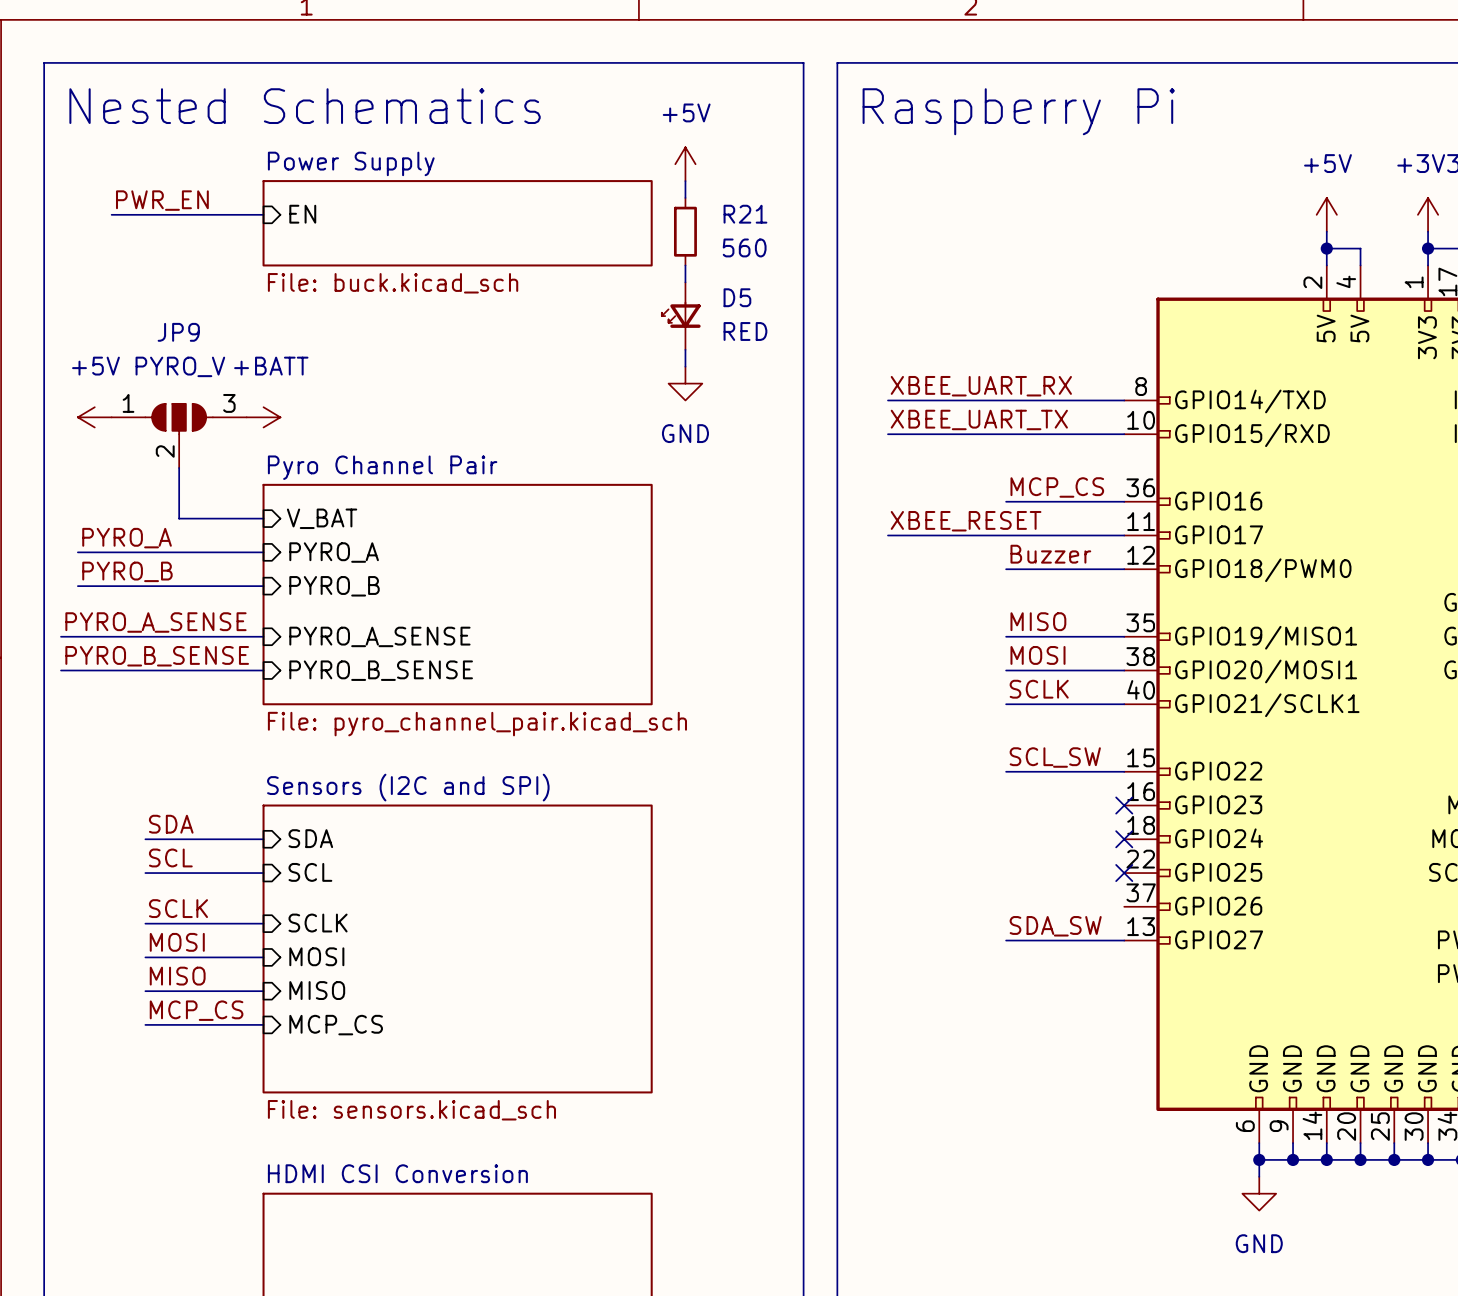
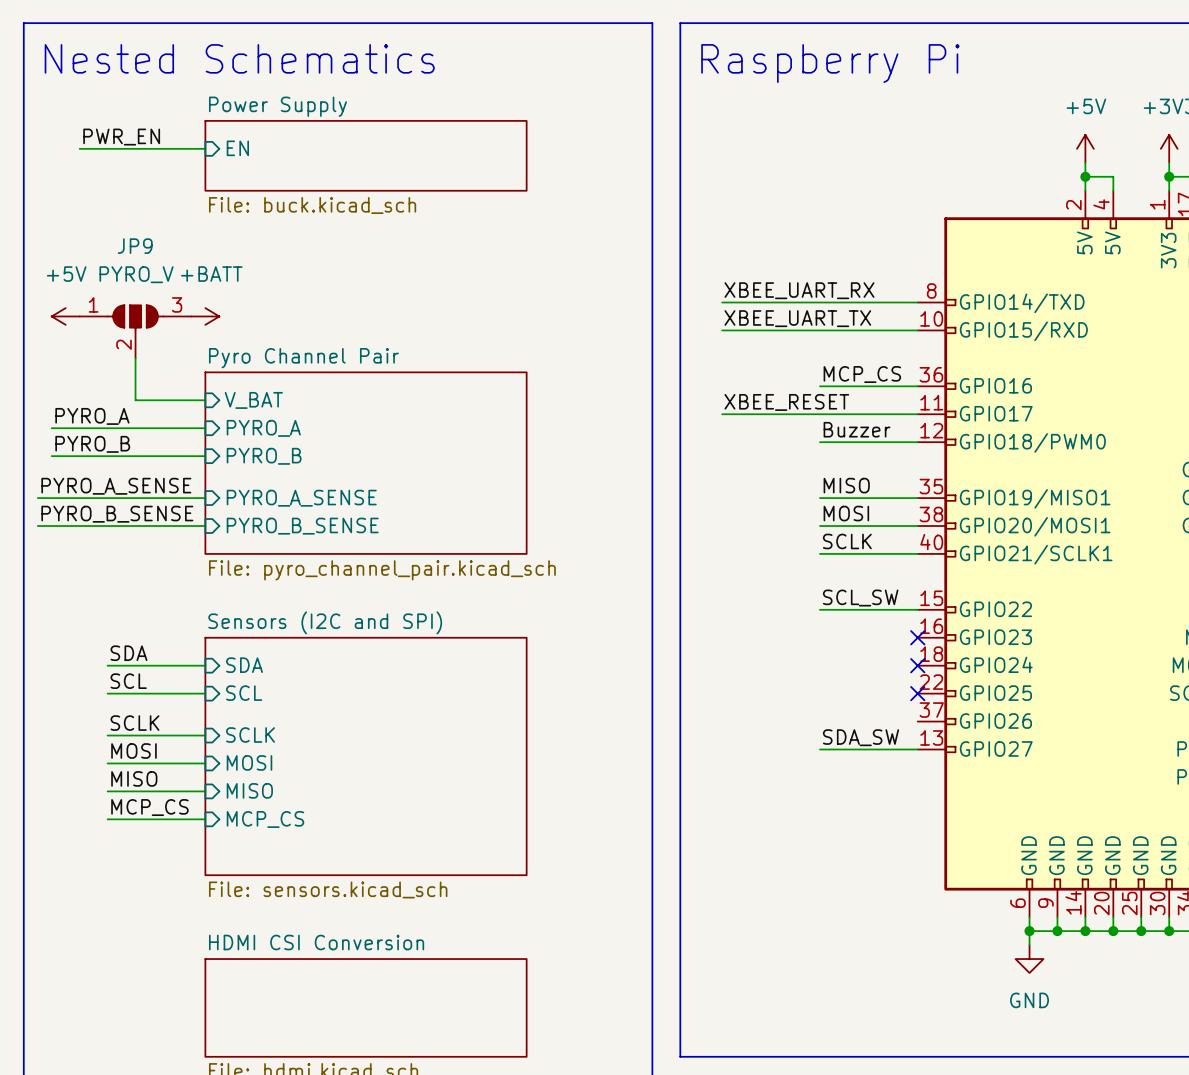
power symbol: +5V (685, 164) -> none
wire: (685, 181) (685, 197) -> none
R21: 560 (685, 231) -> none
wire: (685, 265) (685, 282) -> none
D5: RED (681, 316) -> none
wire: (685, 349) (685, 366) -> none
power symbol: GND (685, 383) -> none

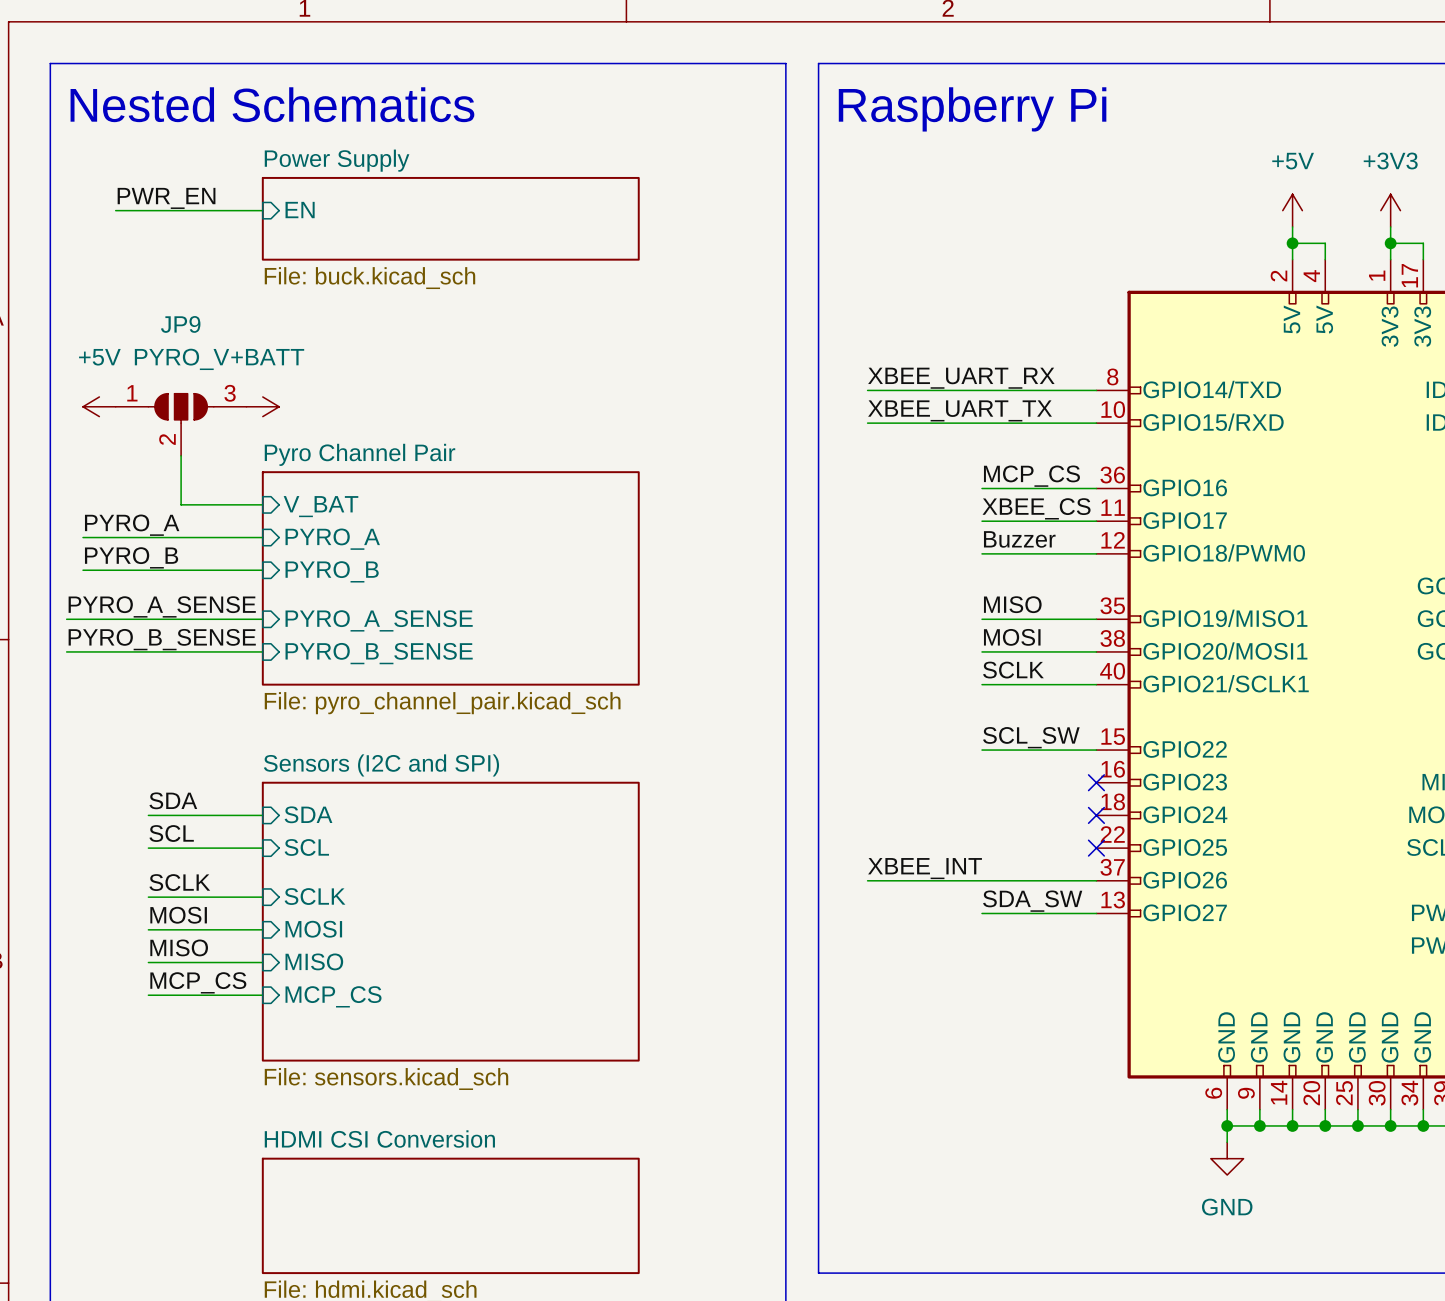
label: XBEE_RESET (786, 402) -> XBEE_CS (1036, 508)
wire: (722, 414) (819, 414) -> none
label: none -> XBEE_INT (925, 868)
wire: none -> (867, 880) (1096, 880)

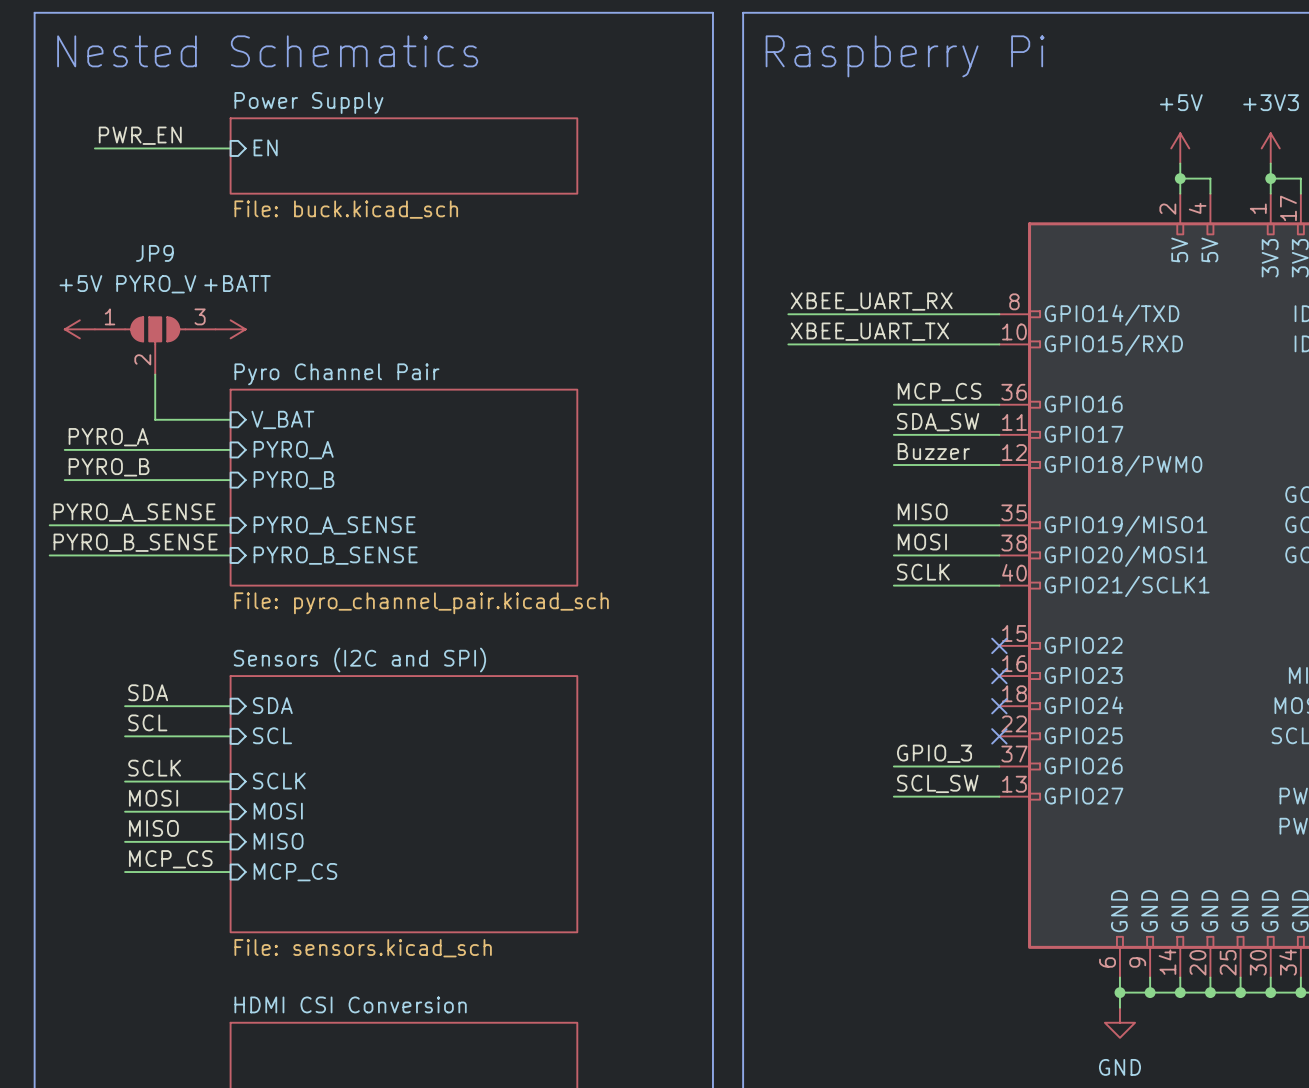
label: XBEE_CS (1036, 508) -> SDA_SW (938, 422)
label: SCL_SW (1031, 737) -> none
wire: (982, 750) (1096, 750) -> none
no-connect mark: none -> (999, 645)
label: XBEE_INT (925, 868) -> none
label: none -> GPIO_3 (934, 753)
wire: (867, 880) (982, 880) -> none
label: SDA_SW (1032, 901) -> SCL_SW (937, 783)

